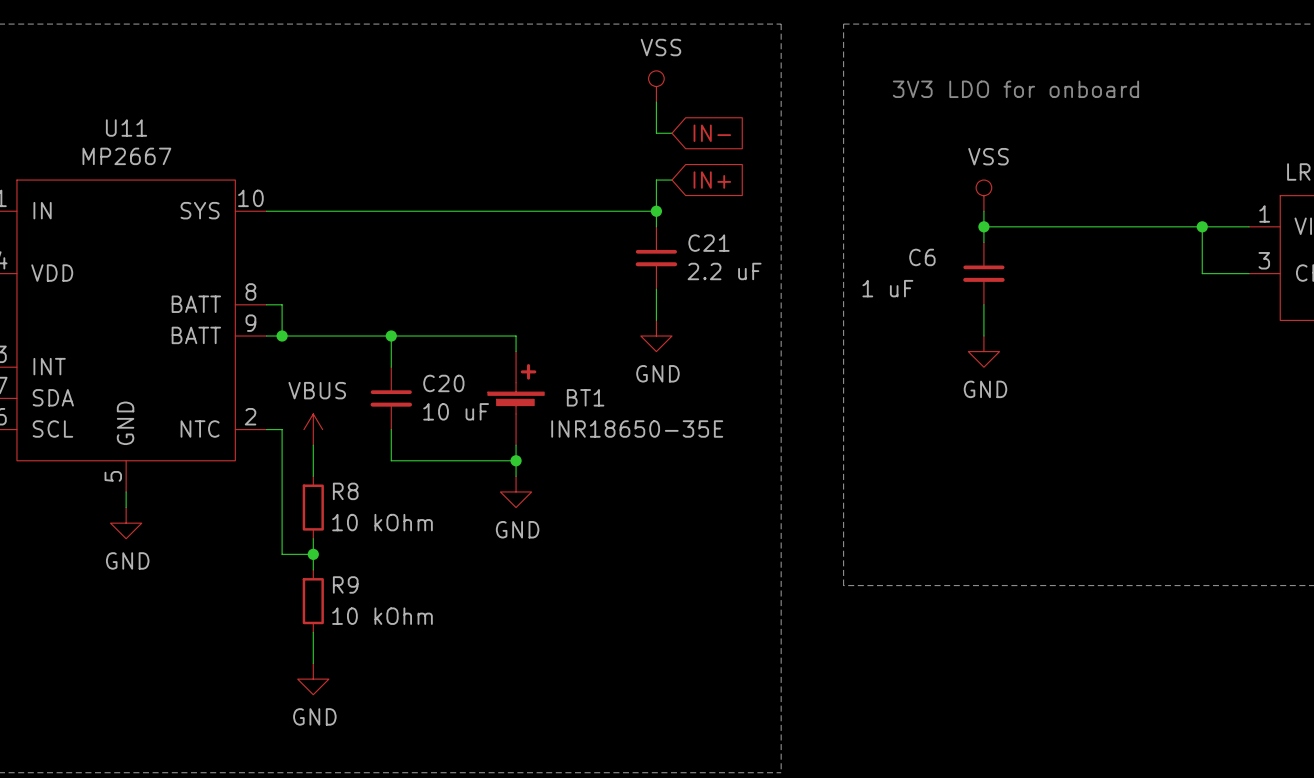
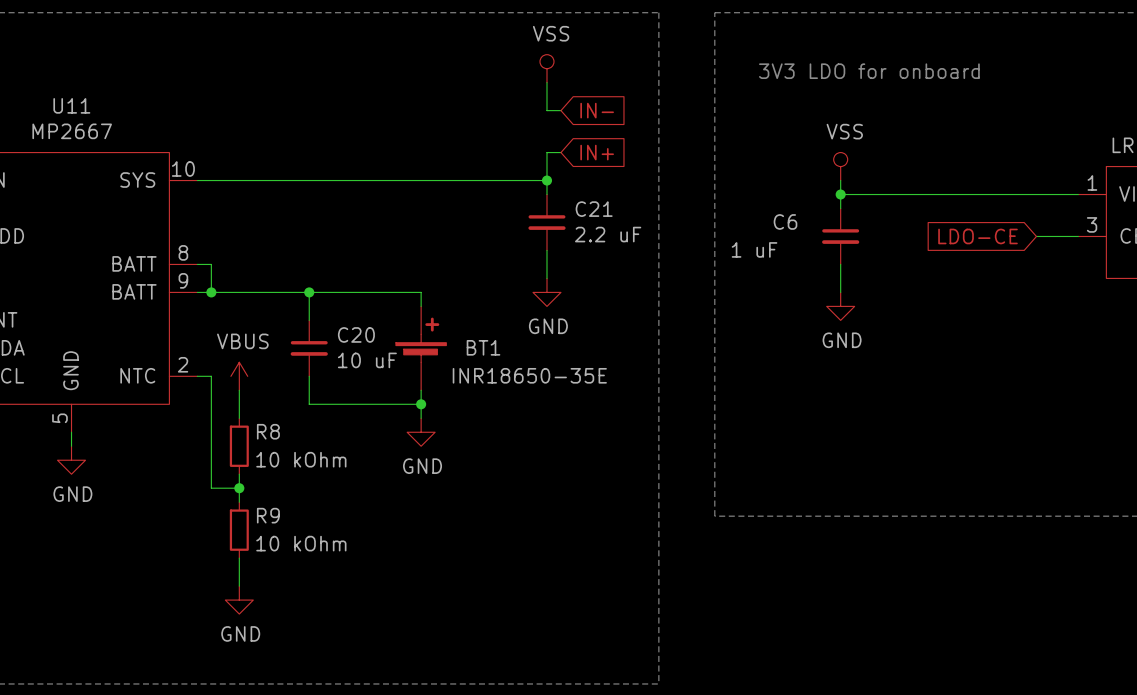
wire: (1202, 226) (1202, 273) -> none
junction: (1202, 226) -> none
global label: none -> LDO-CE (978, 236)

